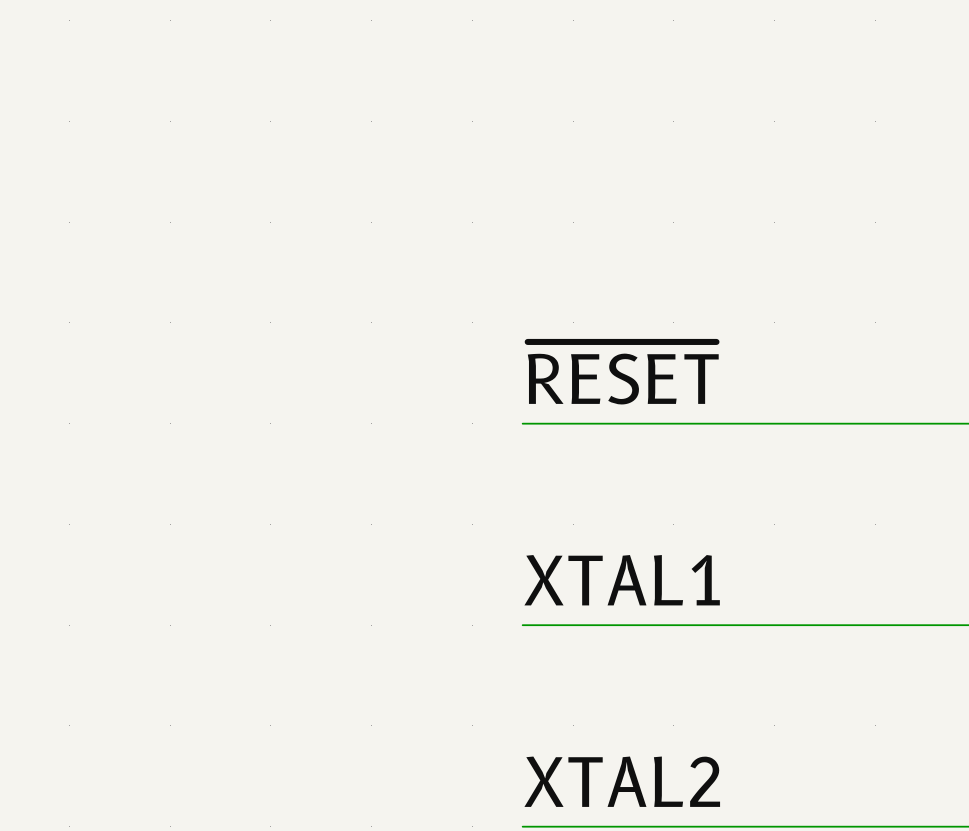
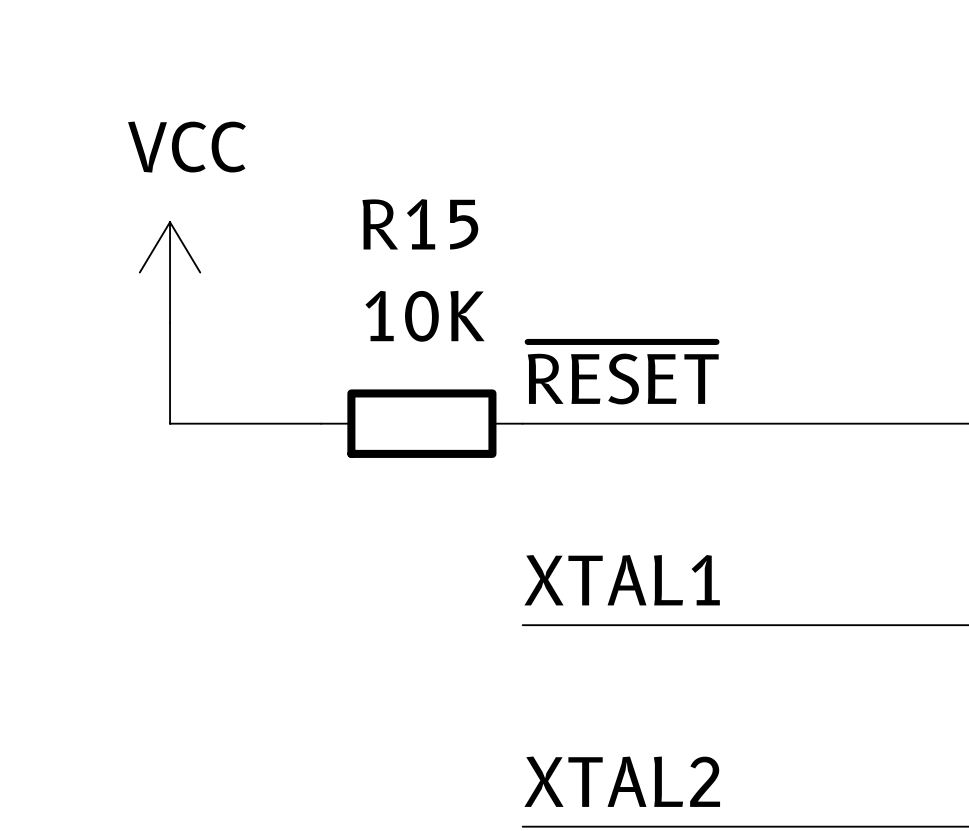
power symbol: none -> VCC (170, 272)
wire: none -> (170, 322) (170, 423) (321, 423)
R15: none -> 10K (421, 423)

